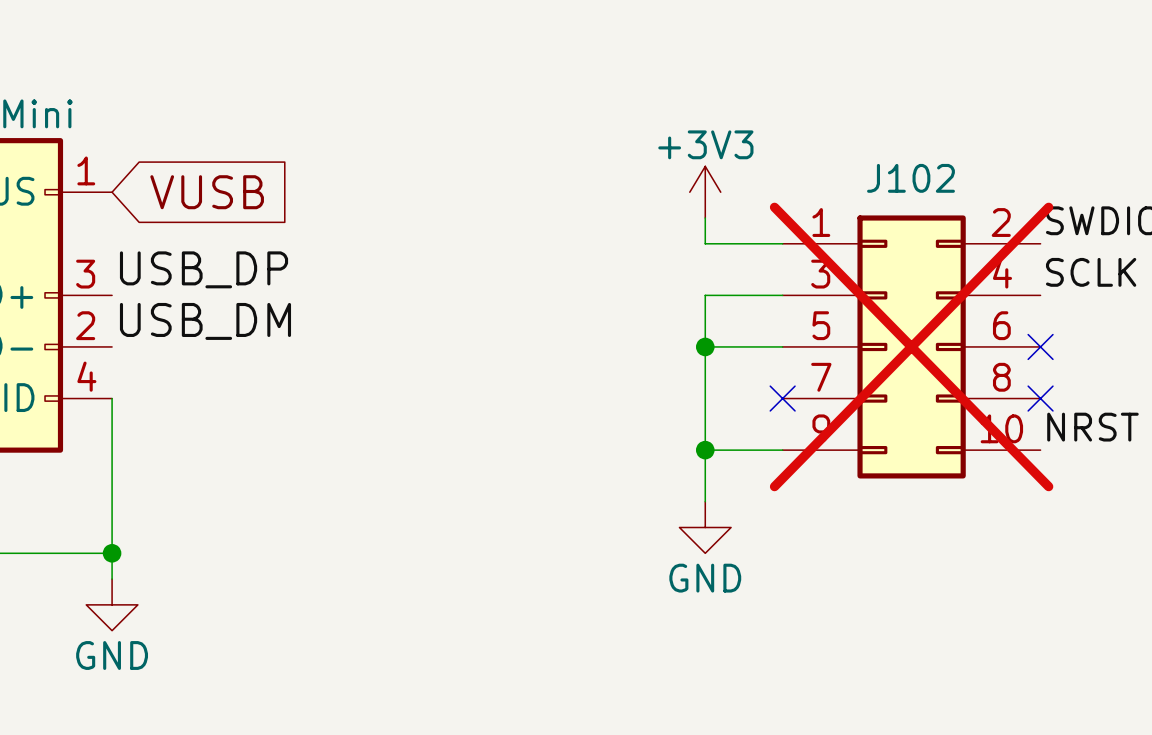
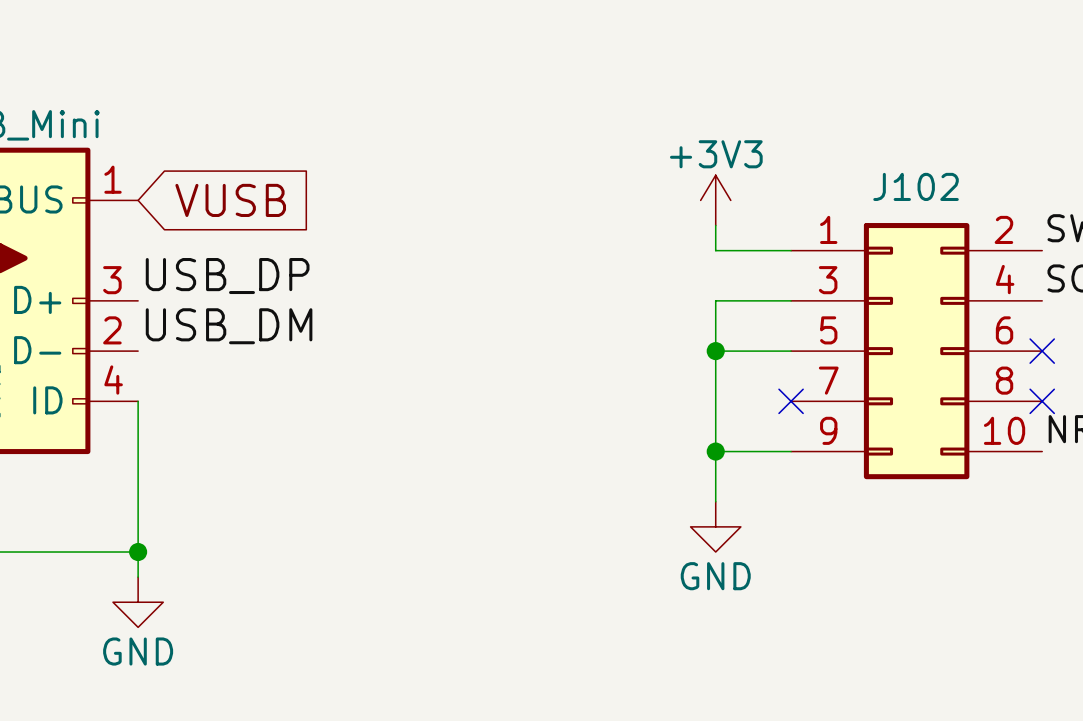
J102 do-not-place cross: (911, 346) -> none

